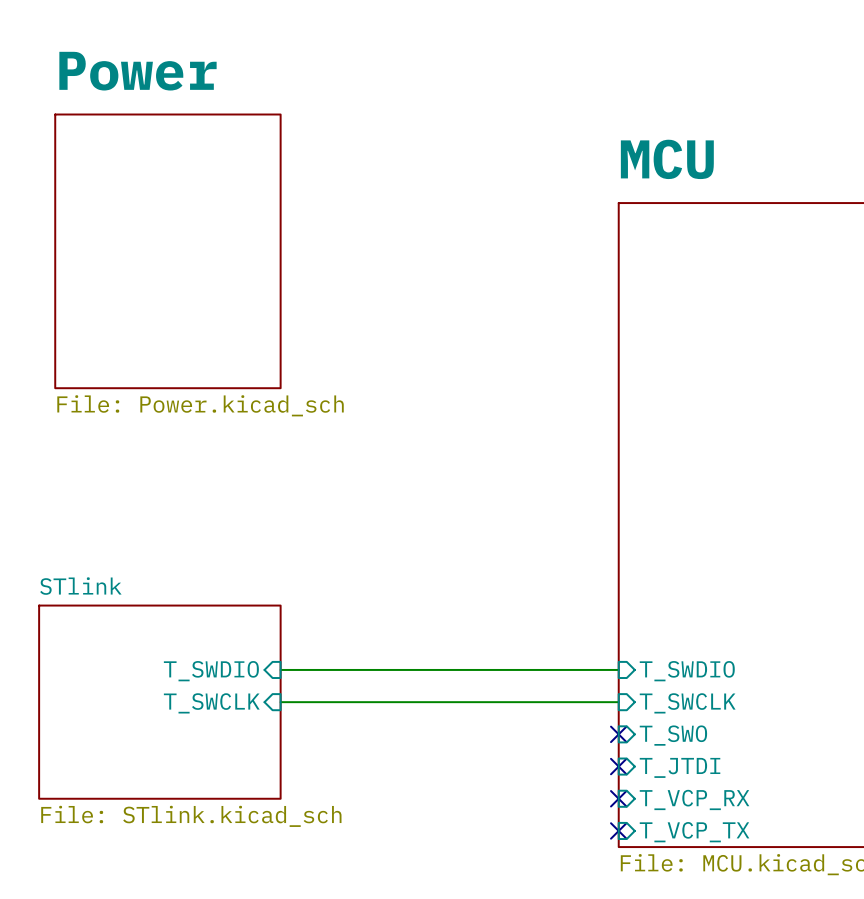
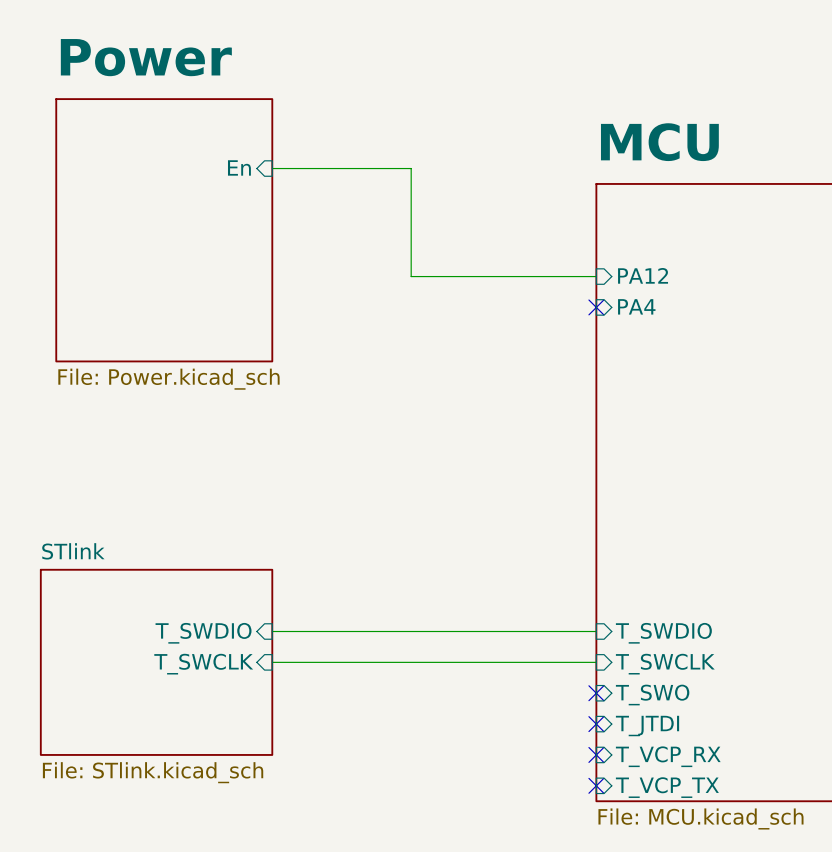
sheet pin: none -> En (239, 167)
wire: none -> (272, 168) (411, 168) (411, 276) (596, 276)
sheet pin: none -> PA12 (643, 275)
no-connect mark: none -> (596, 307)
sheet pin: none -> PA4 (636, 306)

